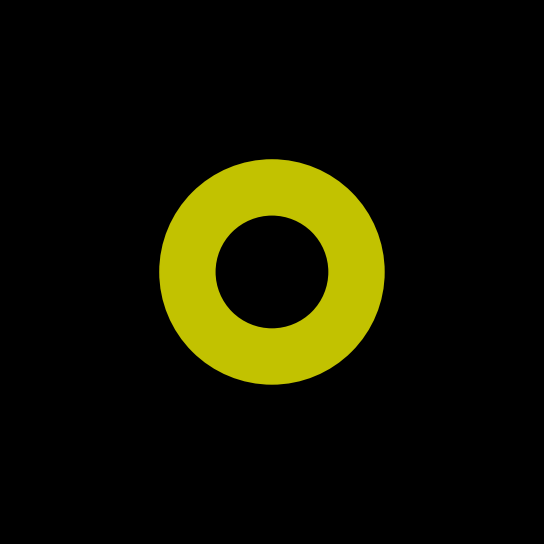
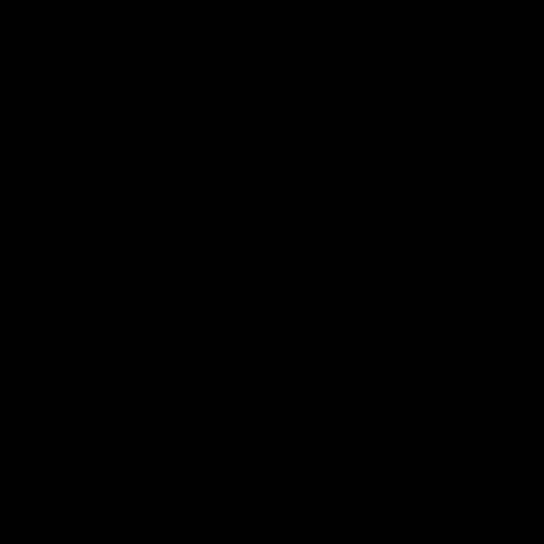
part: (271, 271) -> none

